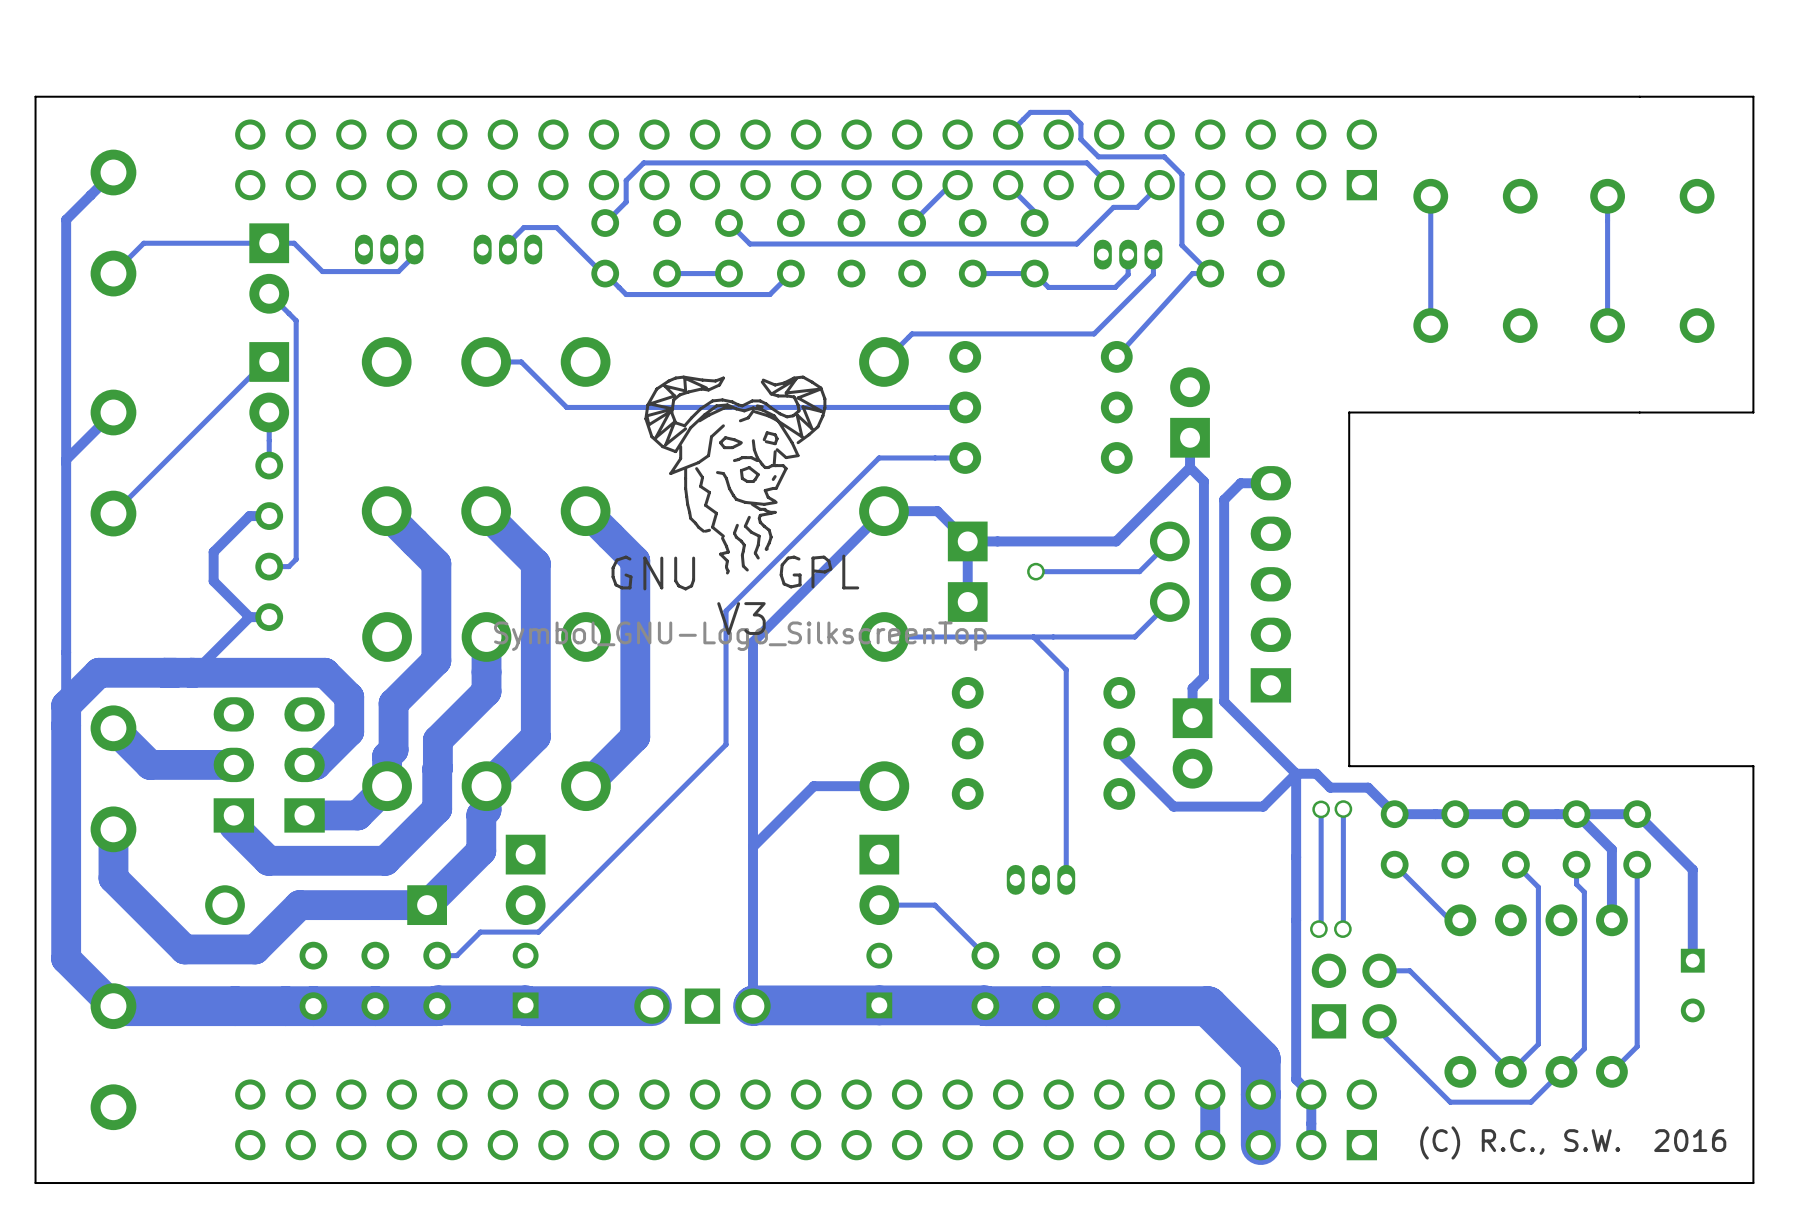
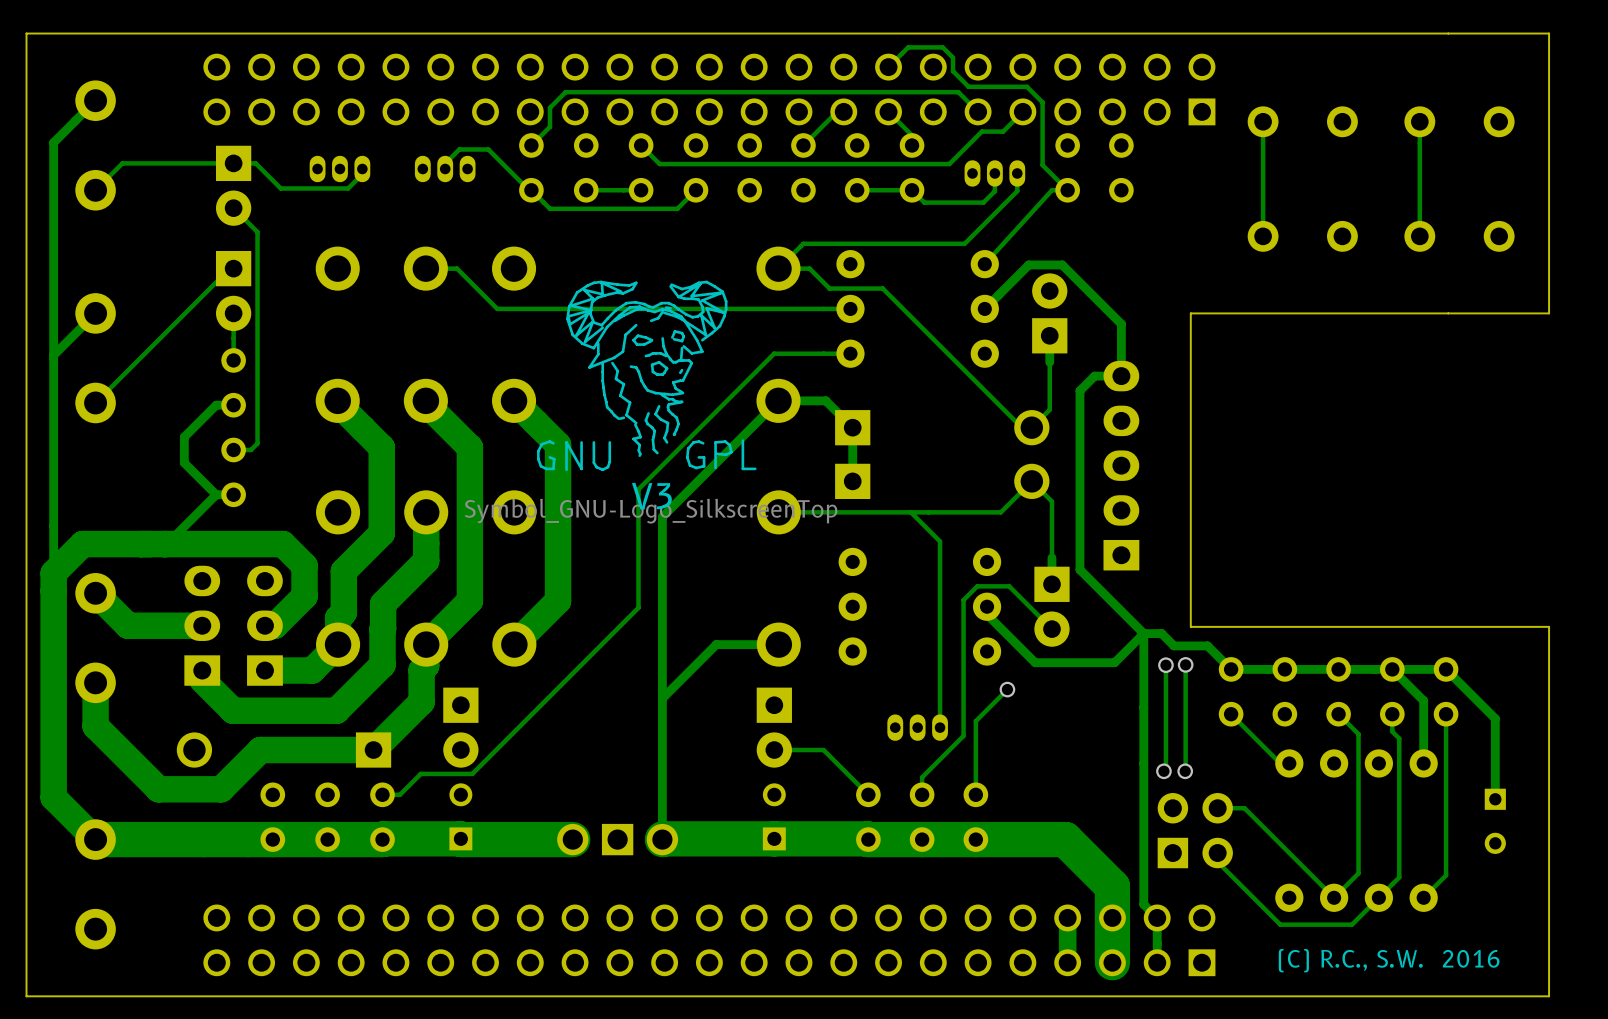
track: none -> (778, 268) (809, 268) (829, 288) (882, 288) (1021, 427)
track: none -> (984, 308) (1028, 264) (1062, 264) (1121, 324) (1121, 376)
track: (967, 541) (1116, 541) (1190, 467) (1203, 481) (1203, 676) (1192, 688) -> (1031, 481) (1051, 501) (1051, 557)
track: (1169, 541) (1139, 571) (1035, 571) -> (1031, 427) (1049, 409) (1049, 362)
via: (1035, 571) -> none
track: none -> (1051, 629) (1009, 586) (977, 586) (963, 600) (963, 735) (922, 777) (922, 794)
track: none -> (1007, 689) (975, 721) (975, 794)
via: none -> (1007, 689)

